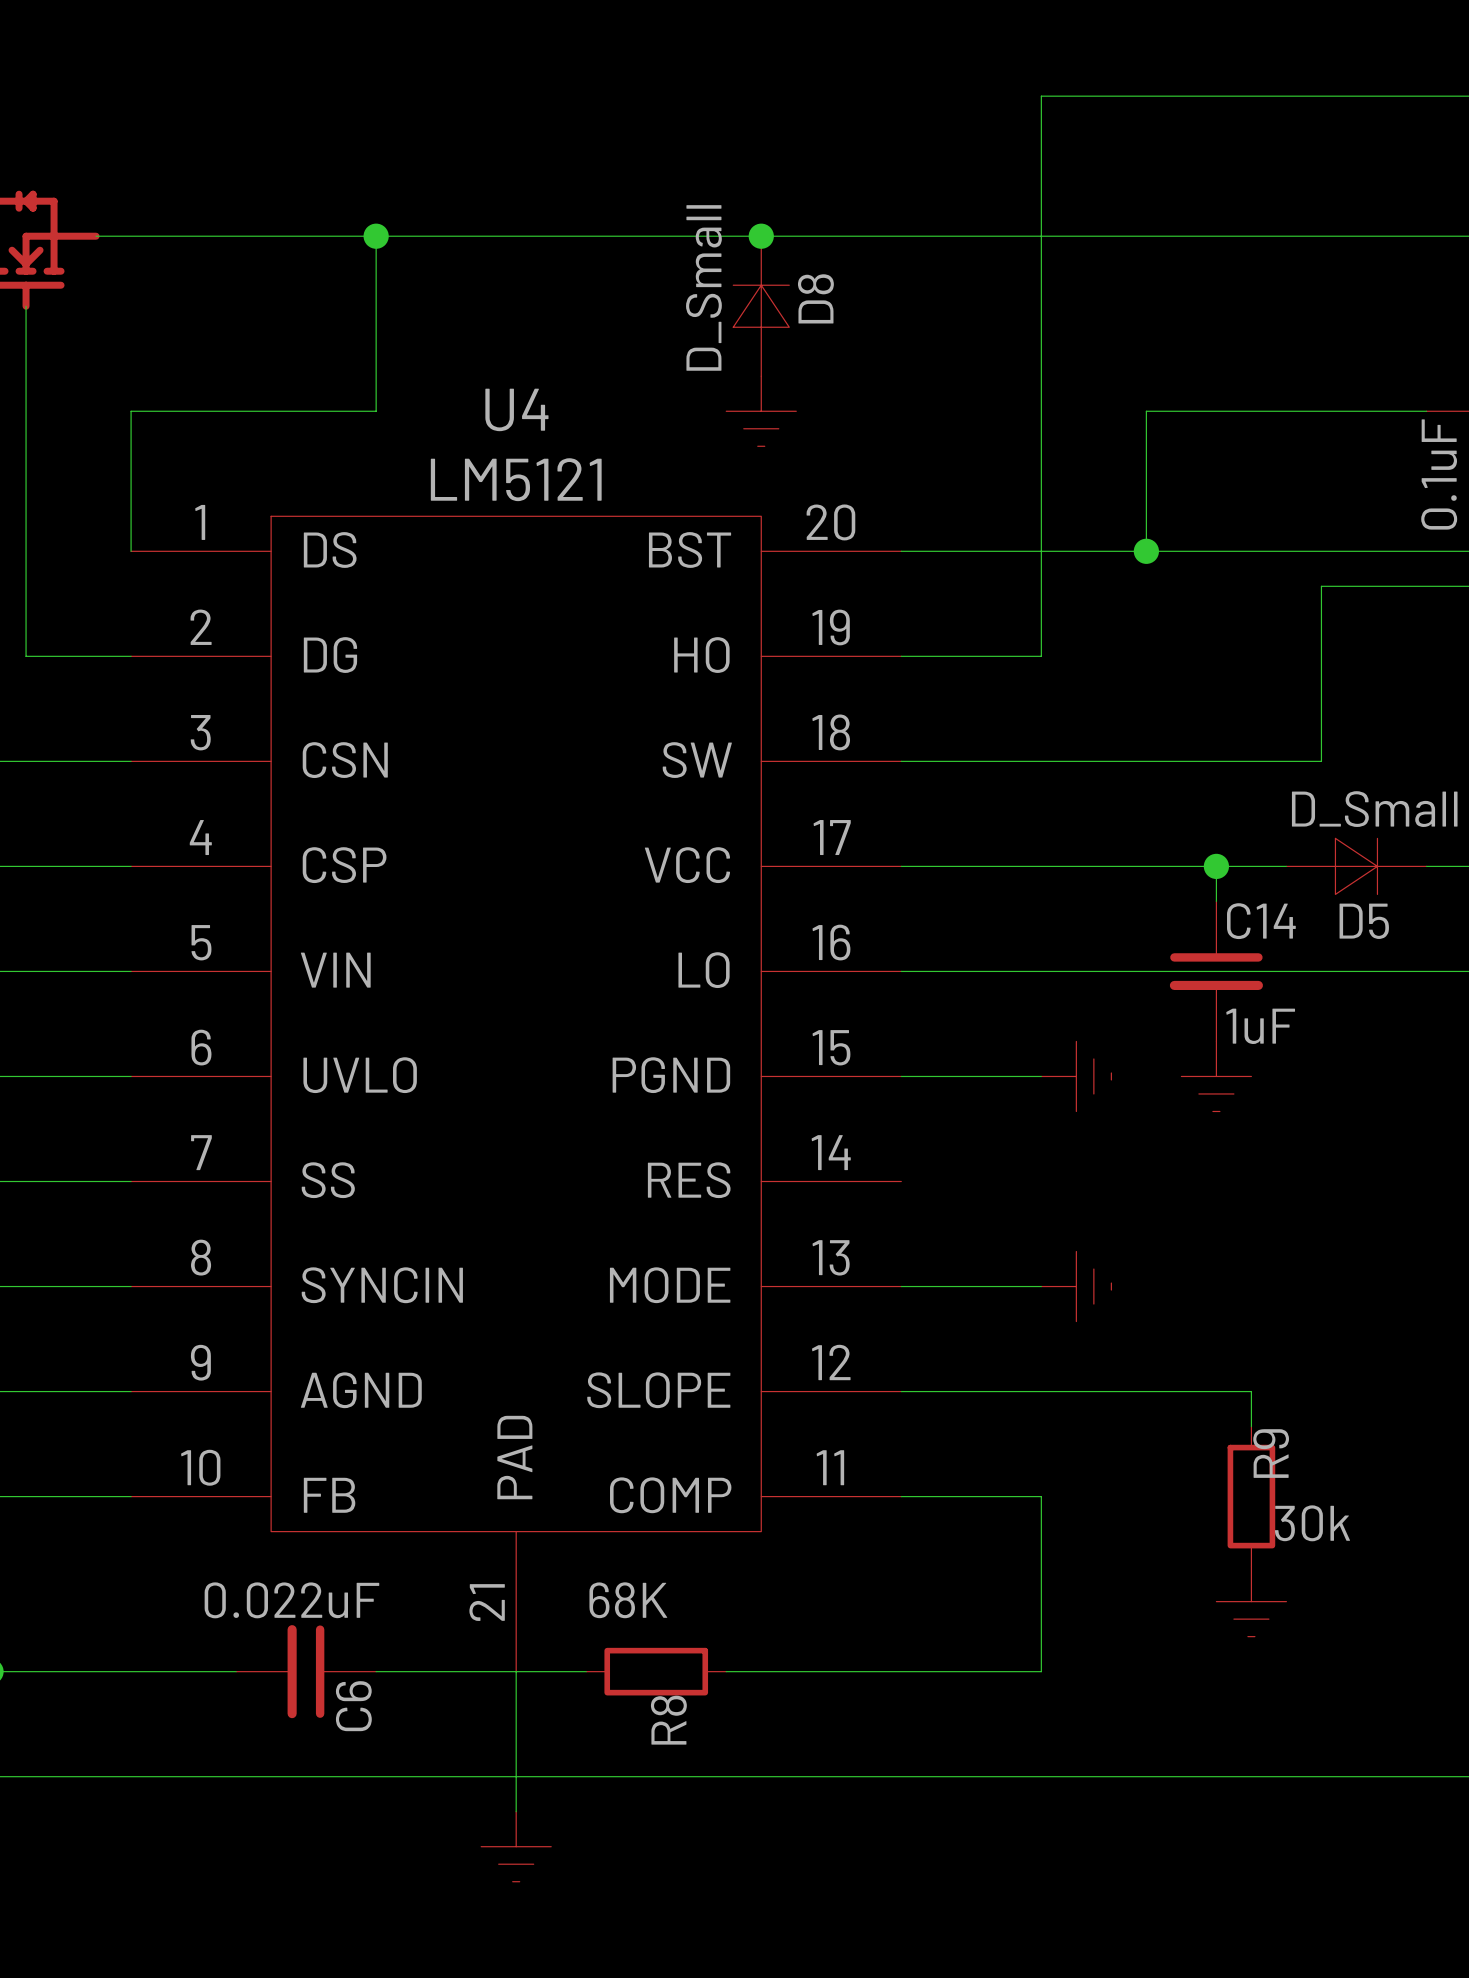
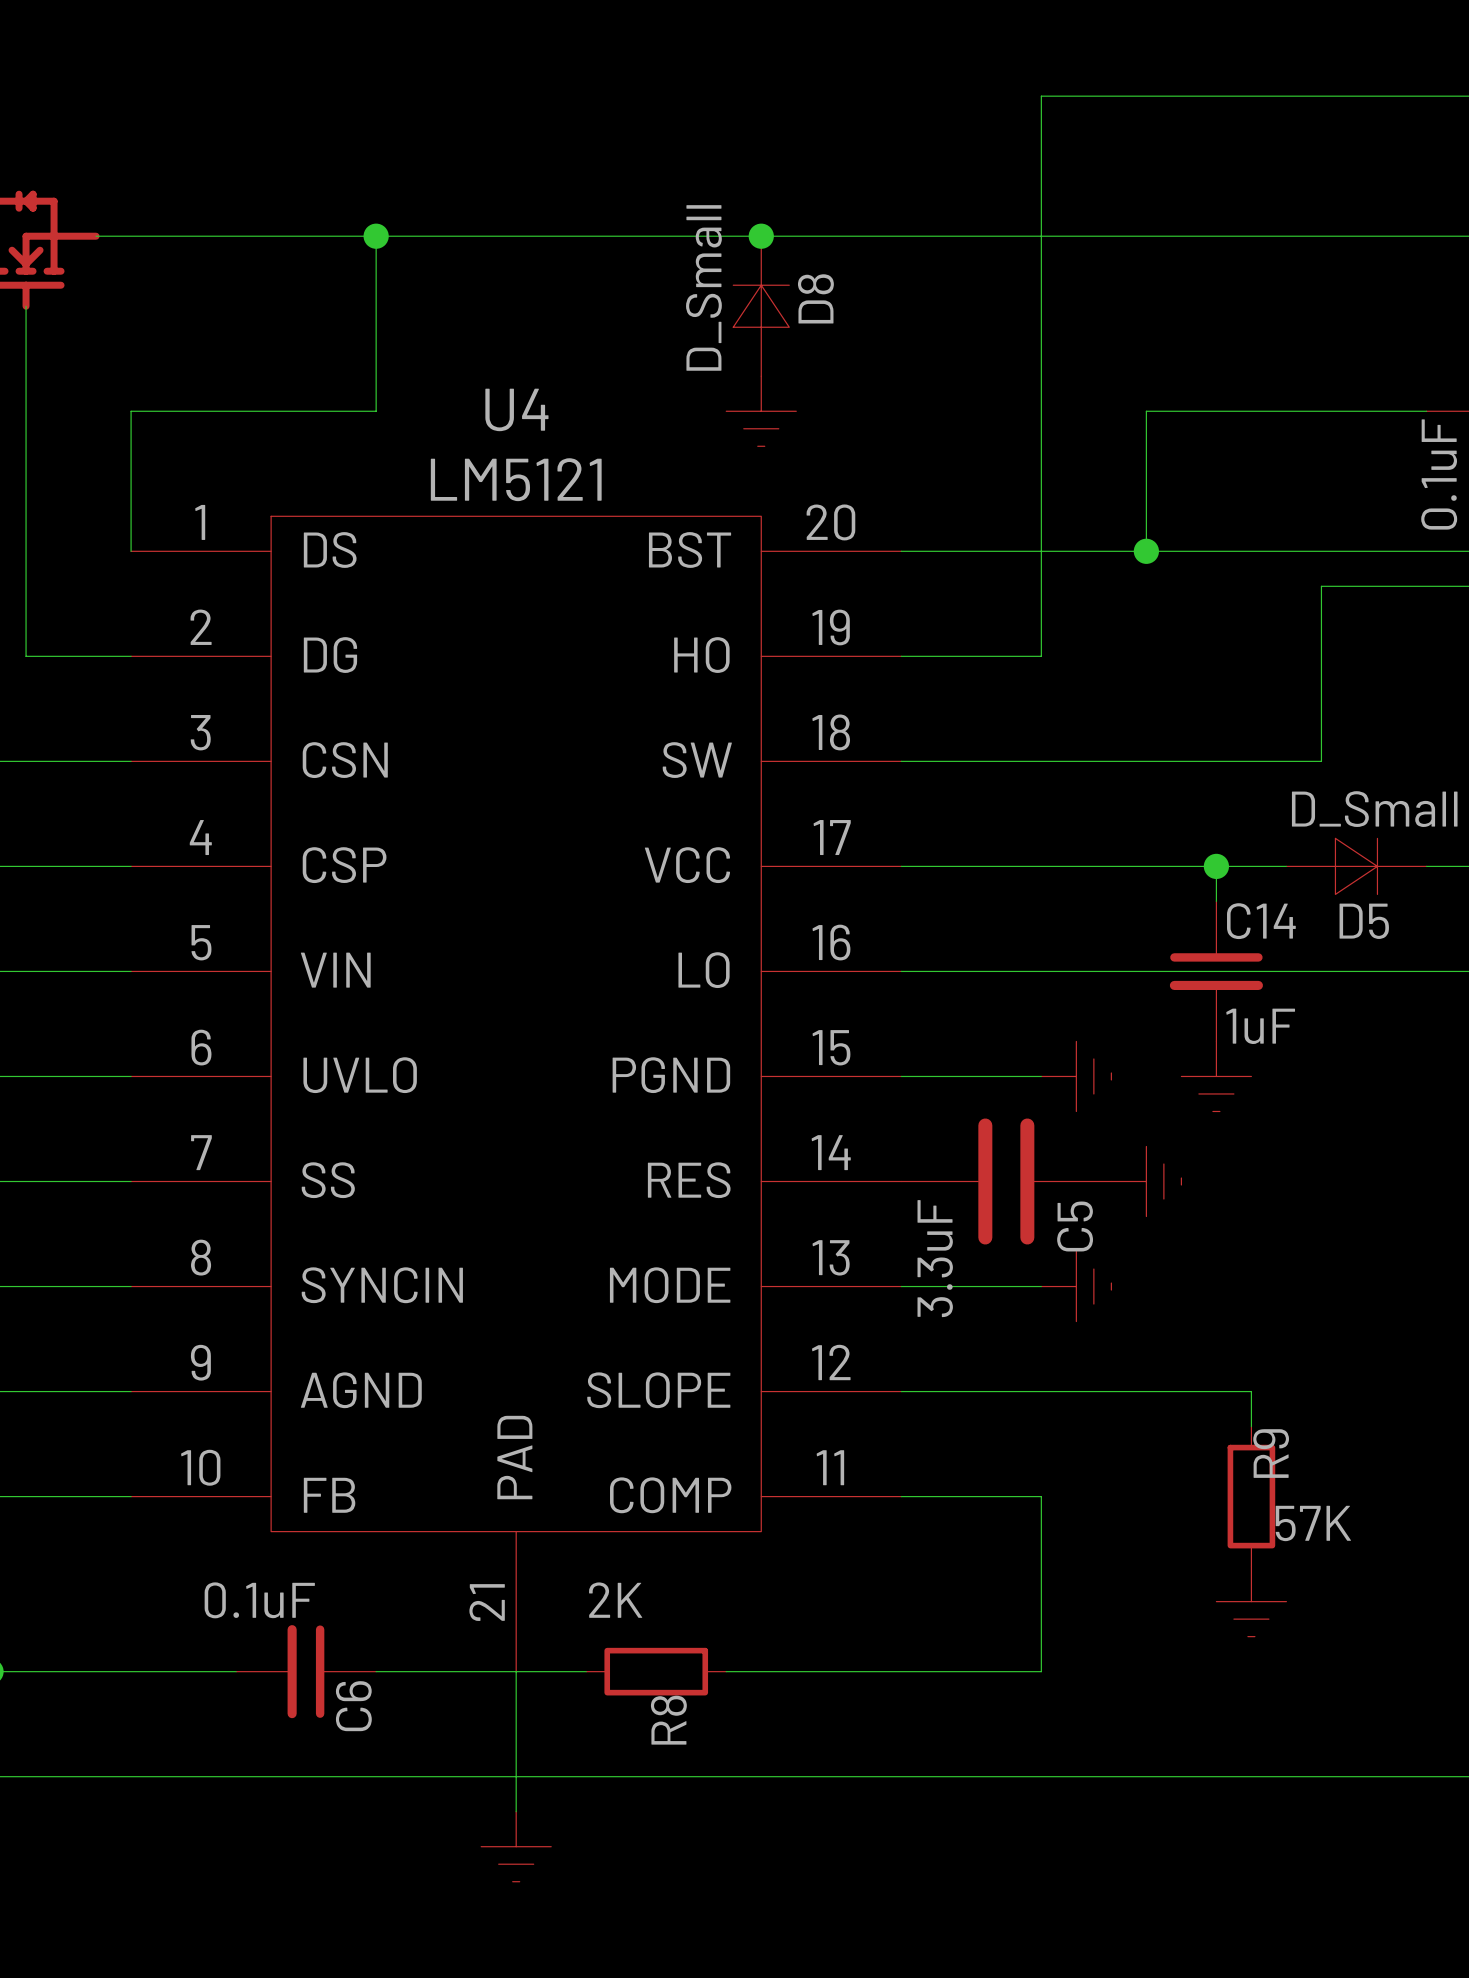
C5: none -> 3.3uF (1006, 1181)
power symbol: none -> (1146, 1181)
R9 value: 30k (1312, 1523) -> 57K (1313, 1523)
C6 value: 0.022uF (291, 1600) -> 0.1uF (259, 1600)
R8 value: 68K (628, 1600) -> 2K (615, 1600)

